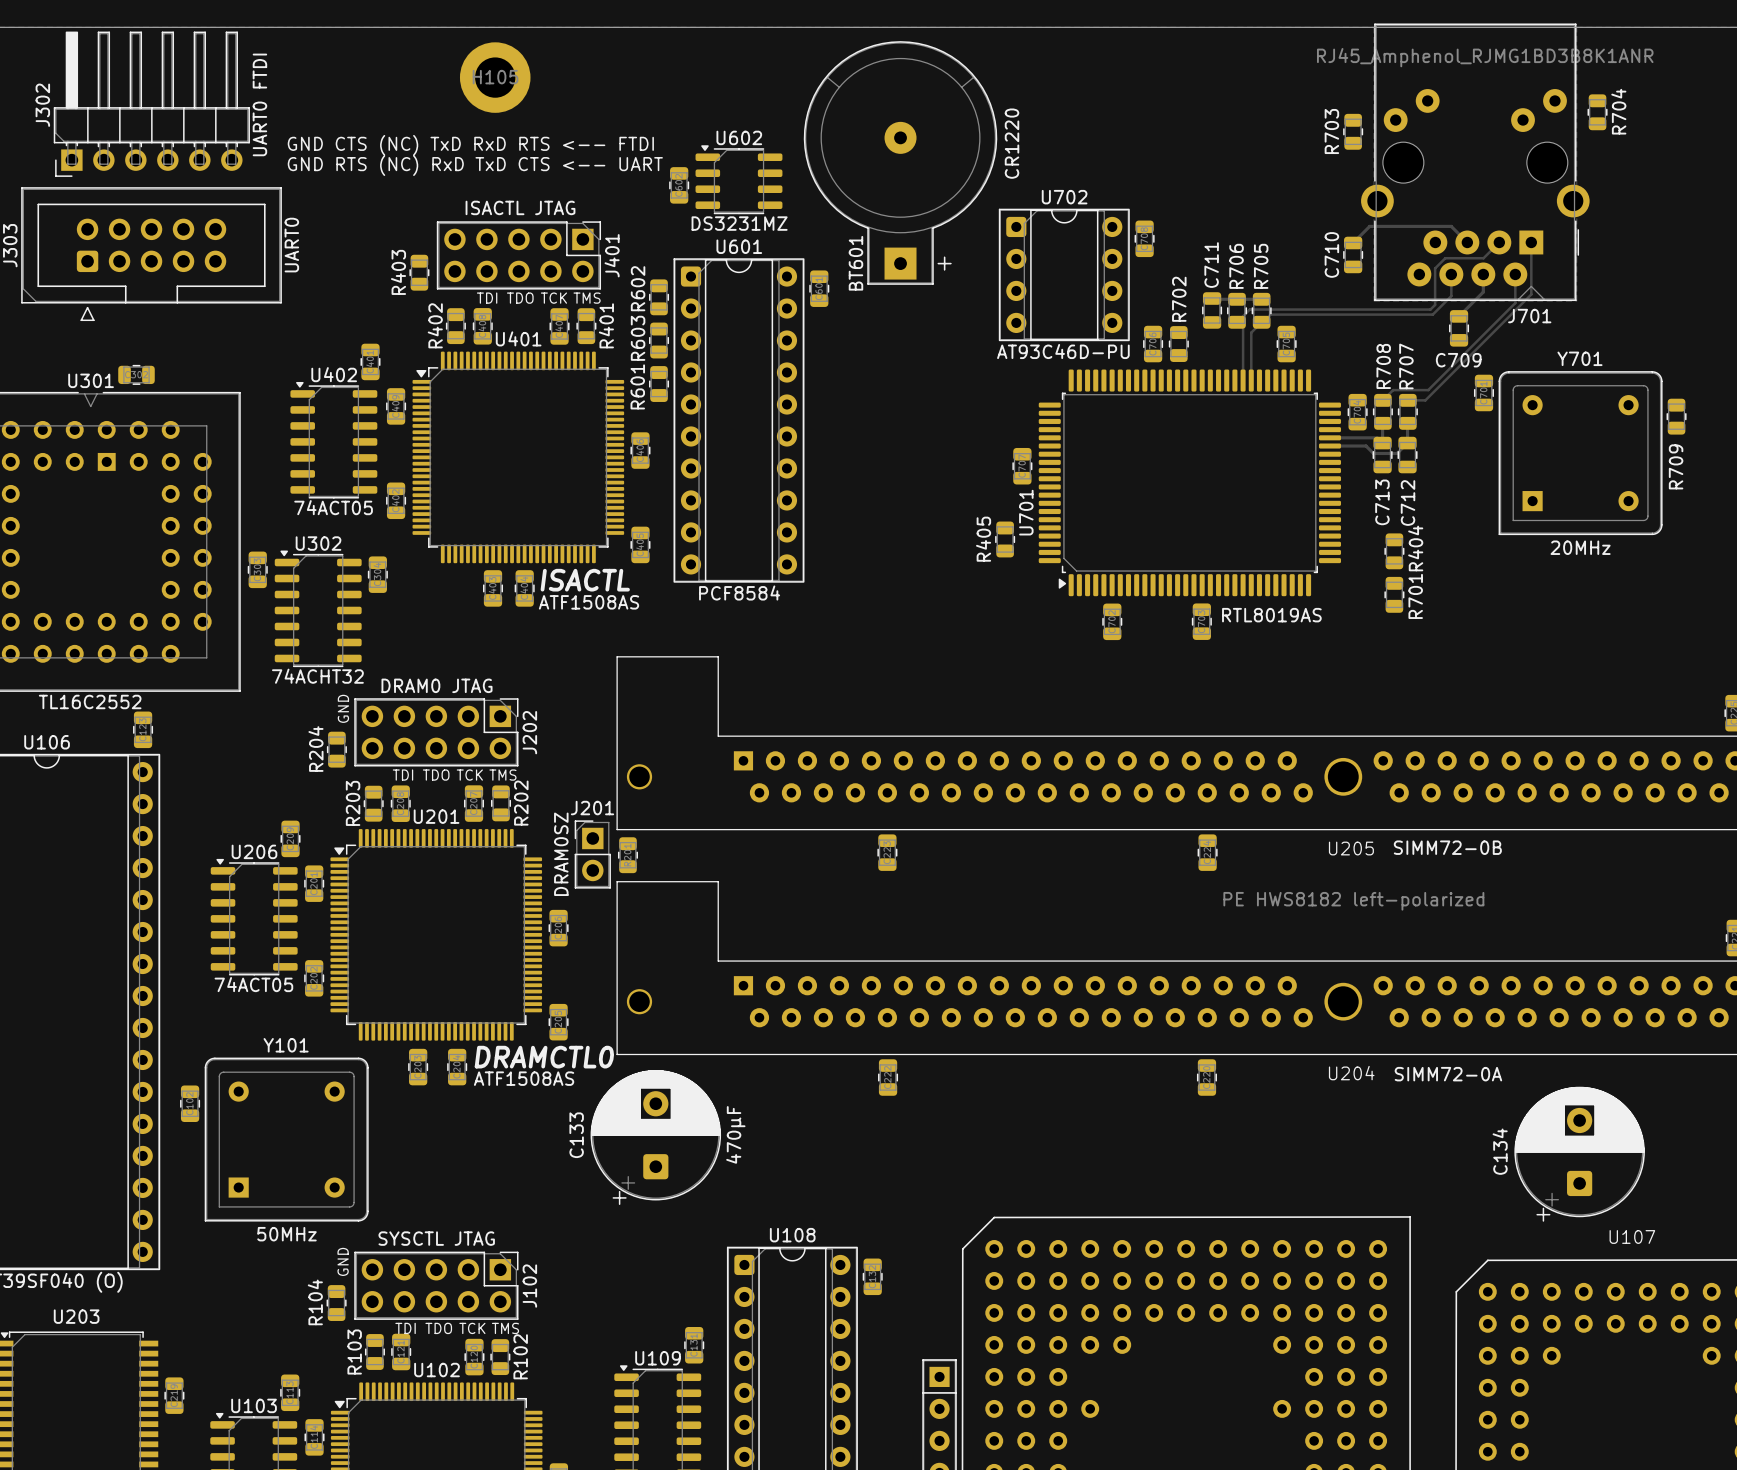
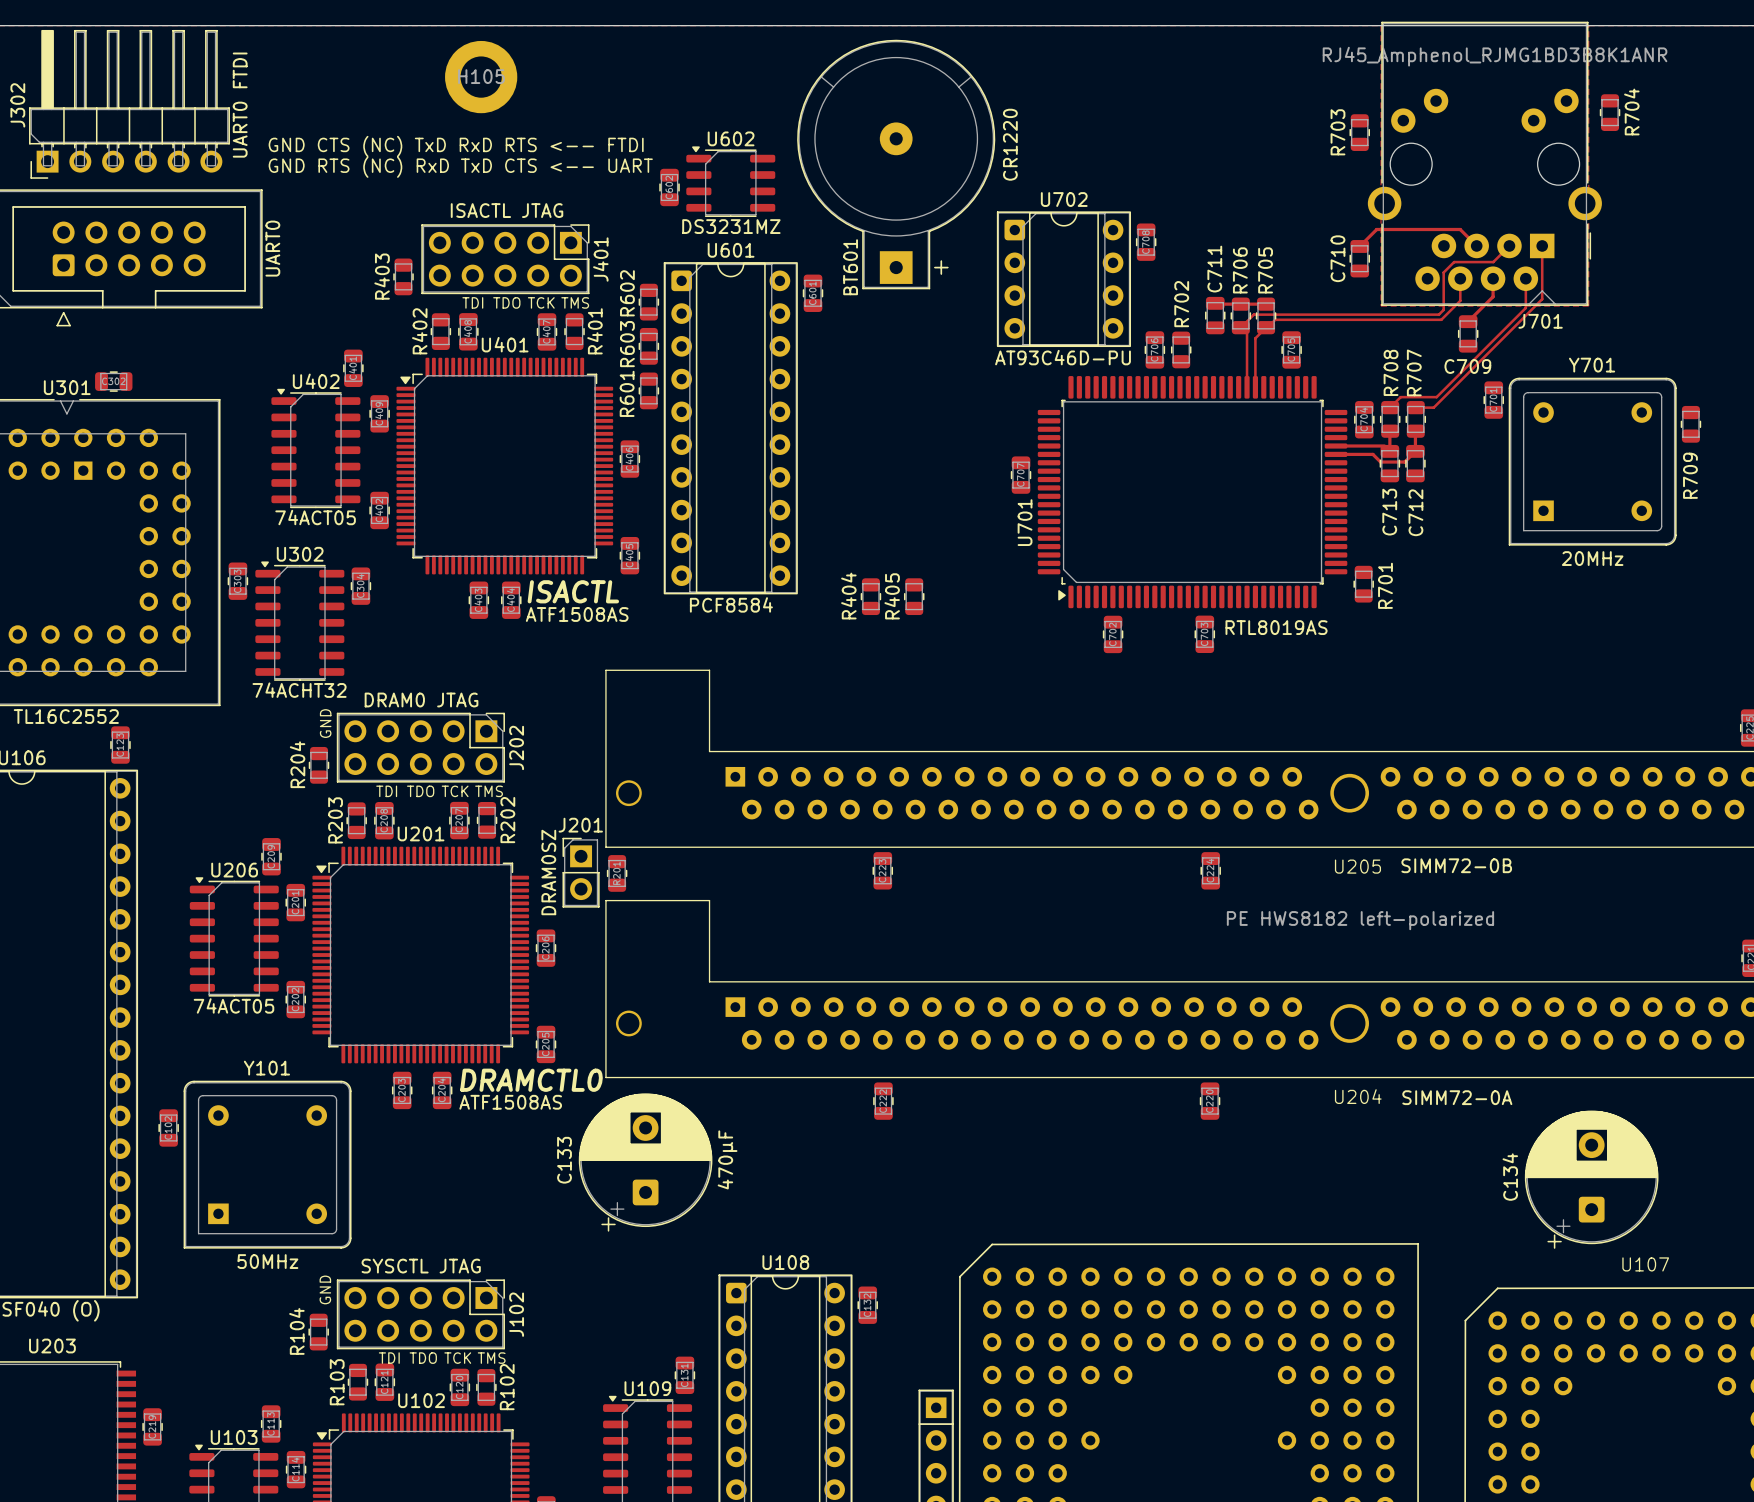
R405 position: (1005, 539) -> (914, 596)
R404 name position: R404 (1415, 548) -> R404 (848, 596)
R404 position: (1394, 551) -> (870, 596)
R701 position: (1394, 594) -> (1363, 584)

